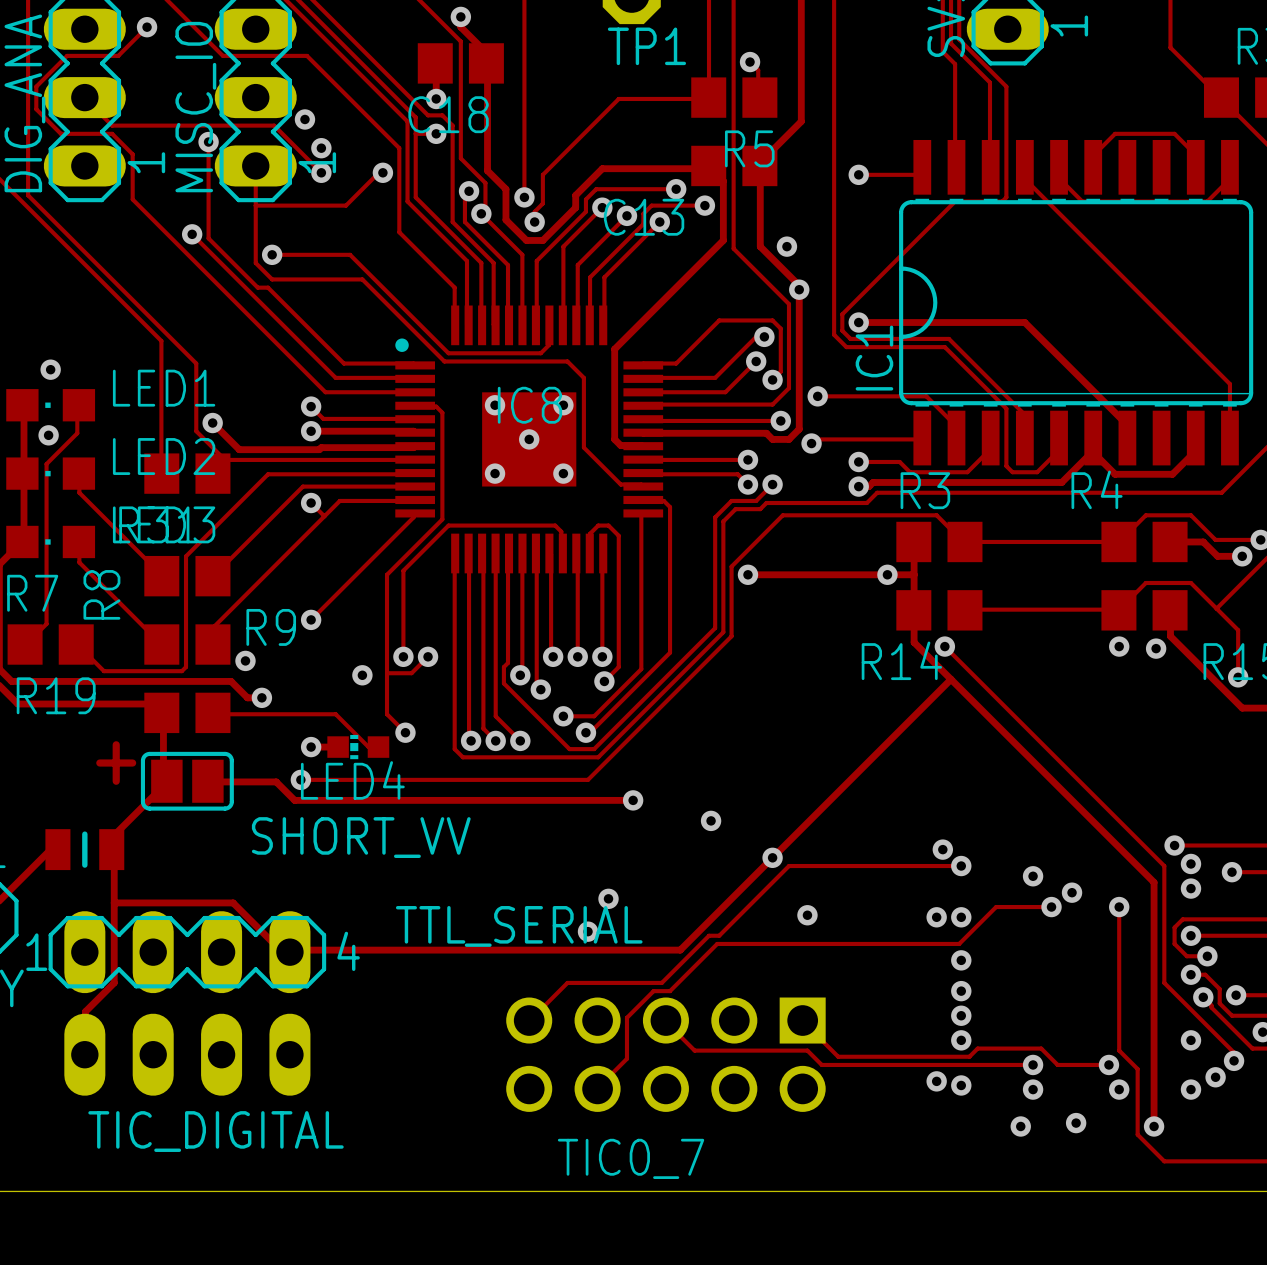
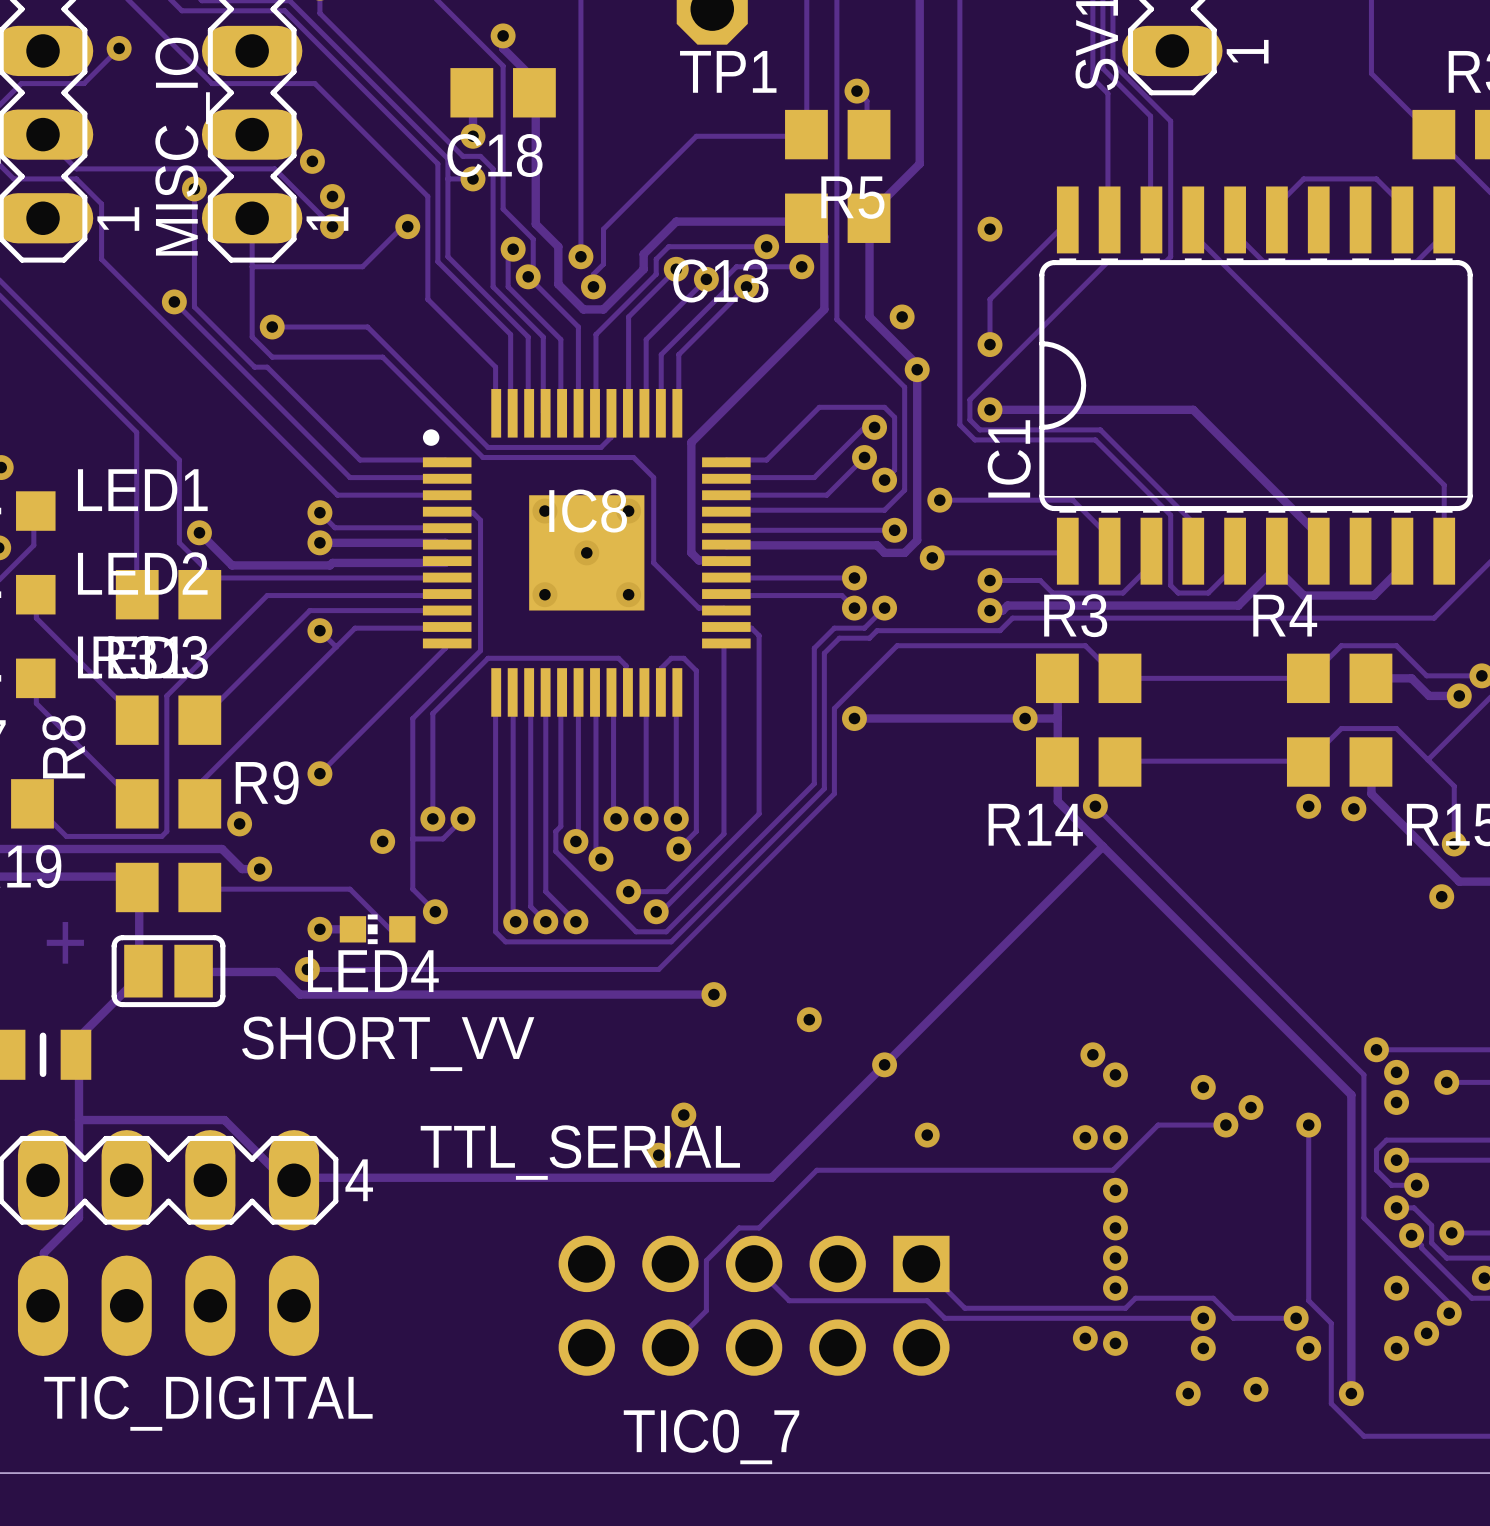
track: (858, 174) (916, 174) -> (989, 344) (989, 299) (1060, 229)
via: none -> (989, 344)
via: none -> (1441, 896)
track: (961, 866) (789, 866) (719, 935) (709, 935) (661, 982) (567, 982) (529, 1020) -> none

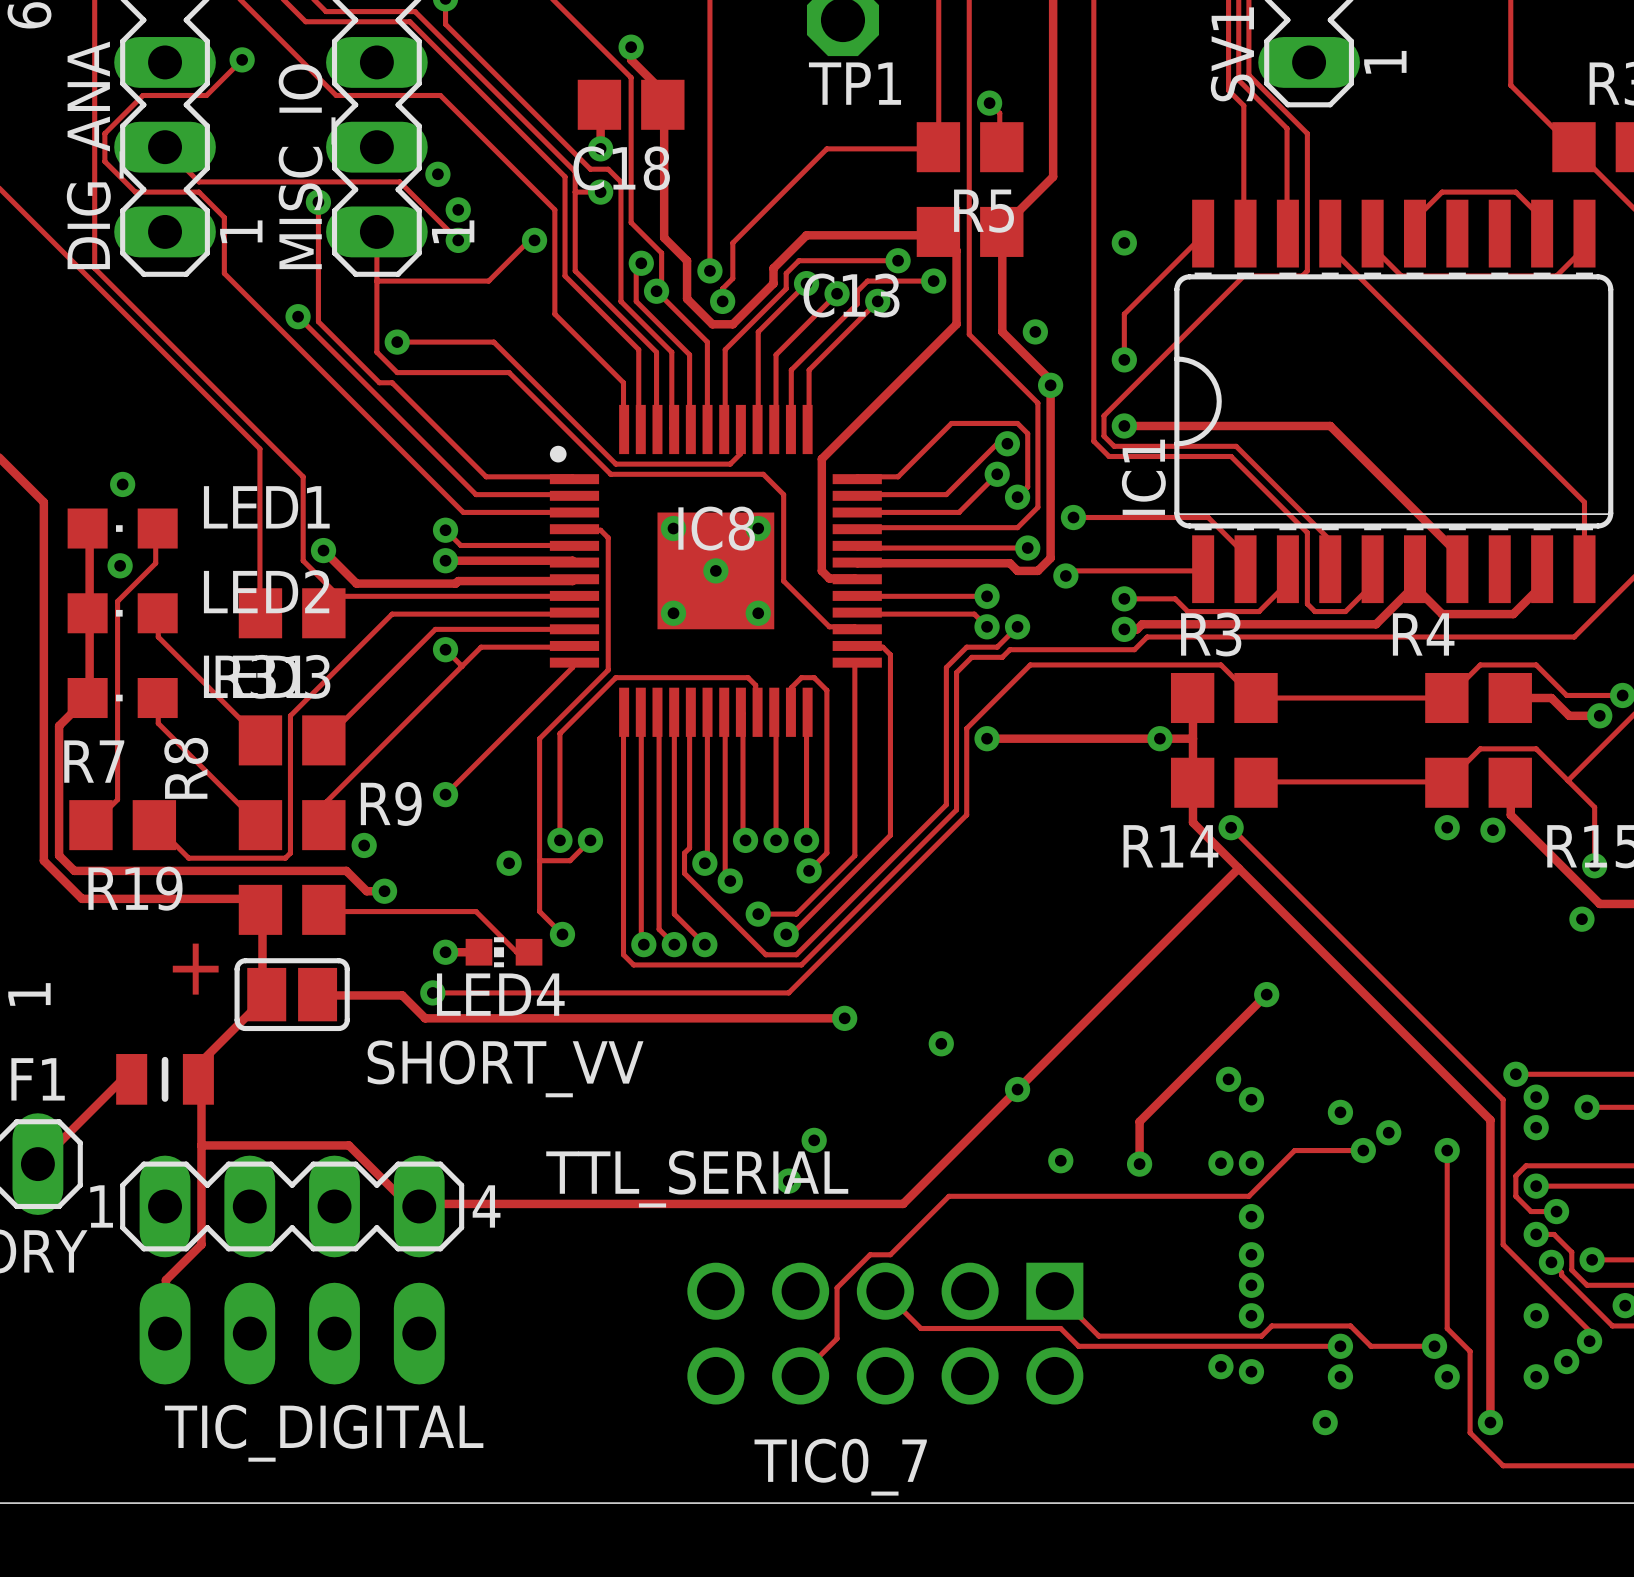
track: none -> (1266, 994) (1139, 1121) (1139, 1164)
via: none -> (1266, 994)
via: none -> (1139, 1164)
via: (1256, 1389) -> none

